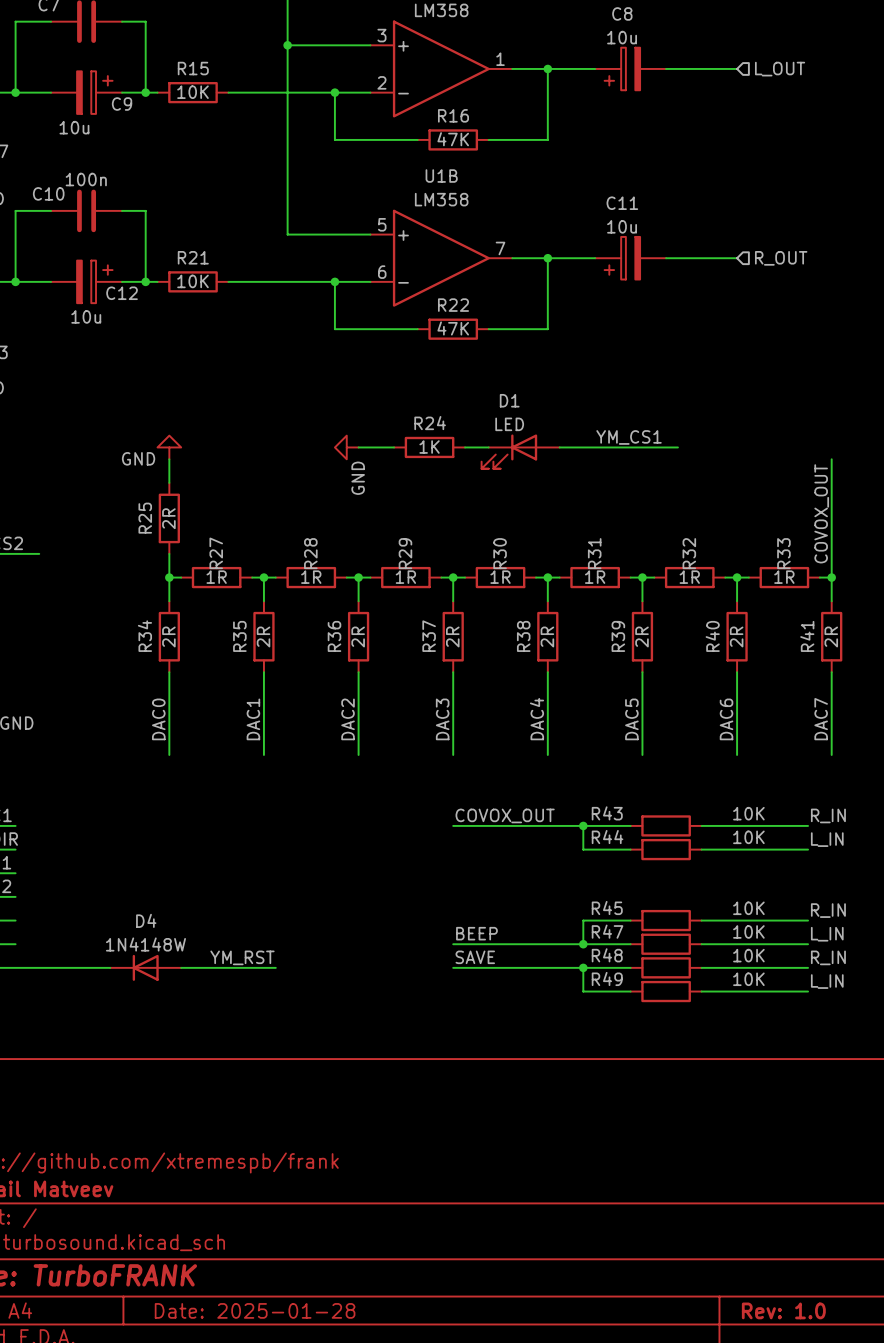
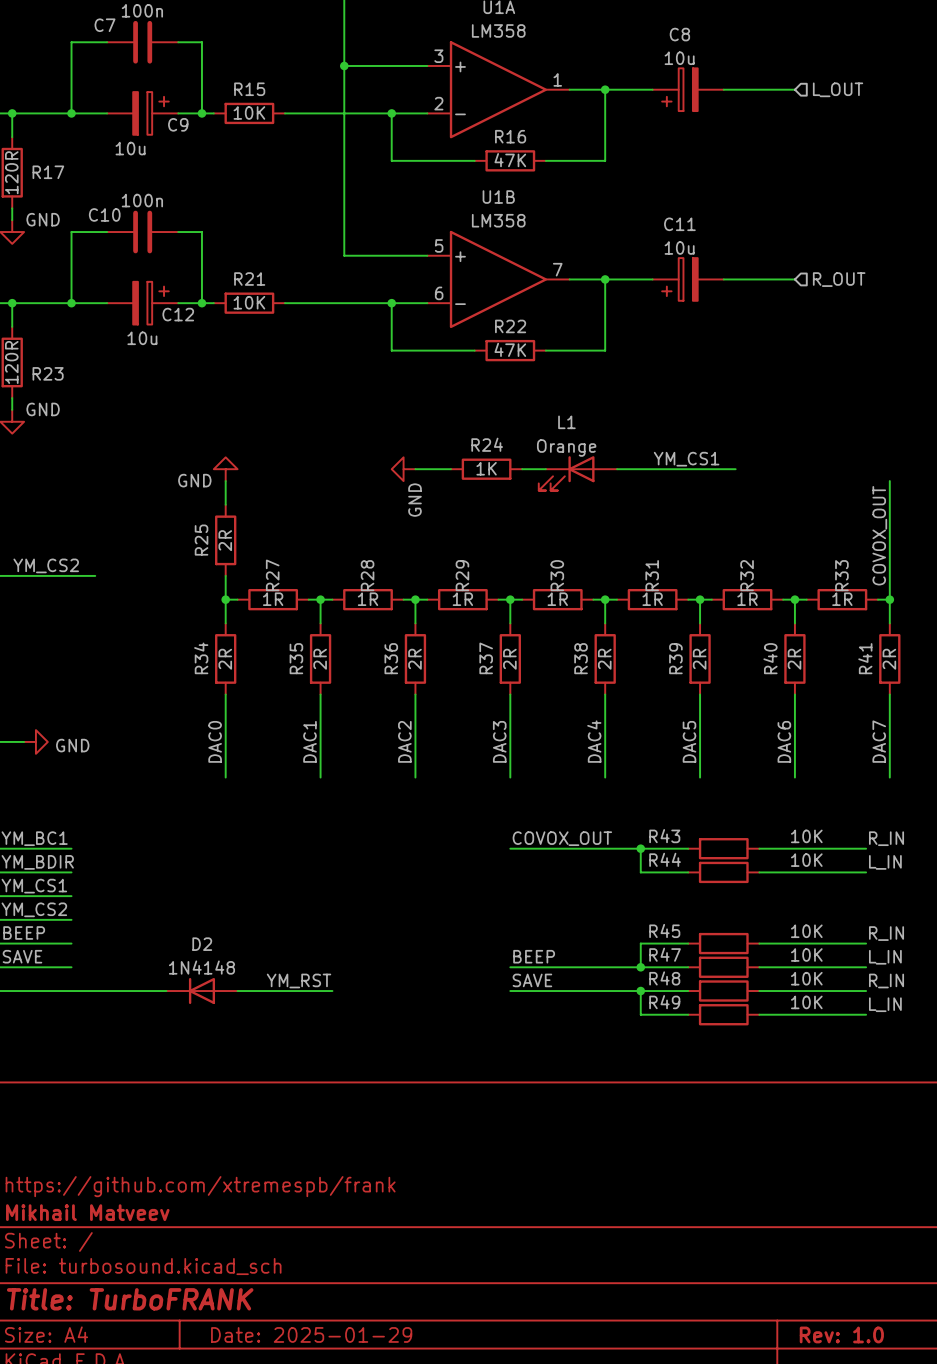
D1 name: D1 (509, 400) -> L1 (566, 422)
D1 value: LED (509, 424) -> Orange (566, 448)
D4 name: D4 (146, 920) -> D2 (202, 944)
D4 value: 1N4148W (145, 944) -> 1N4148 (201, 967)
title block: Date: 2025-01-28 (255, 1310) -> Date: 2025-01-29 (311, 1334)

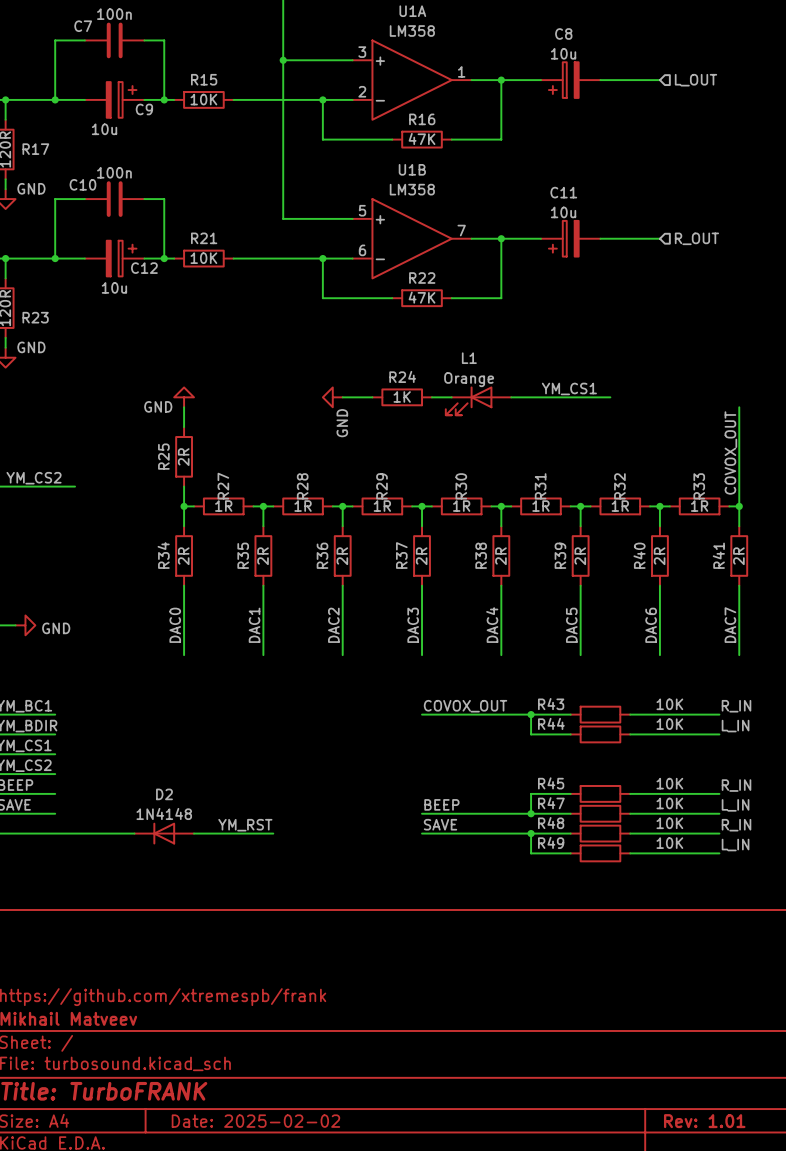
title block: Date: 2025-01-29 (311, 1334) -> Date: 2025-02-02 (255, 1121)
title block: Rev: 1.0 (841, 1334) -> Rev: 1.01 (704, 1121)

